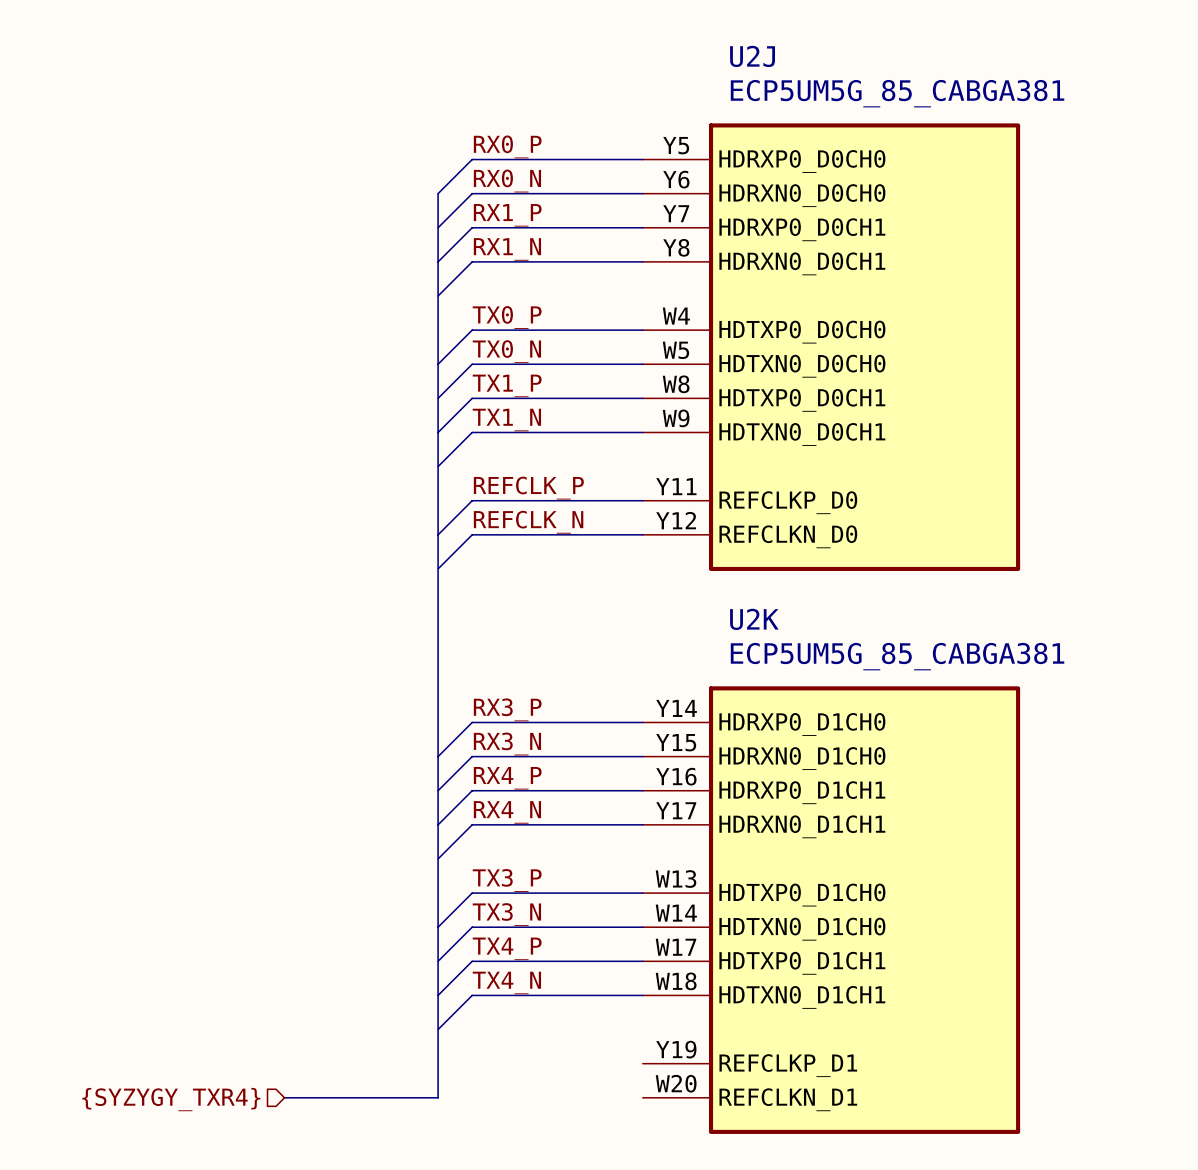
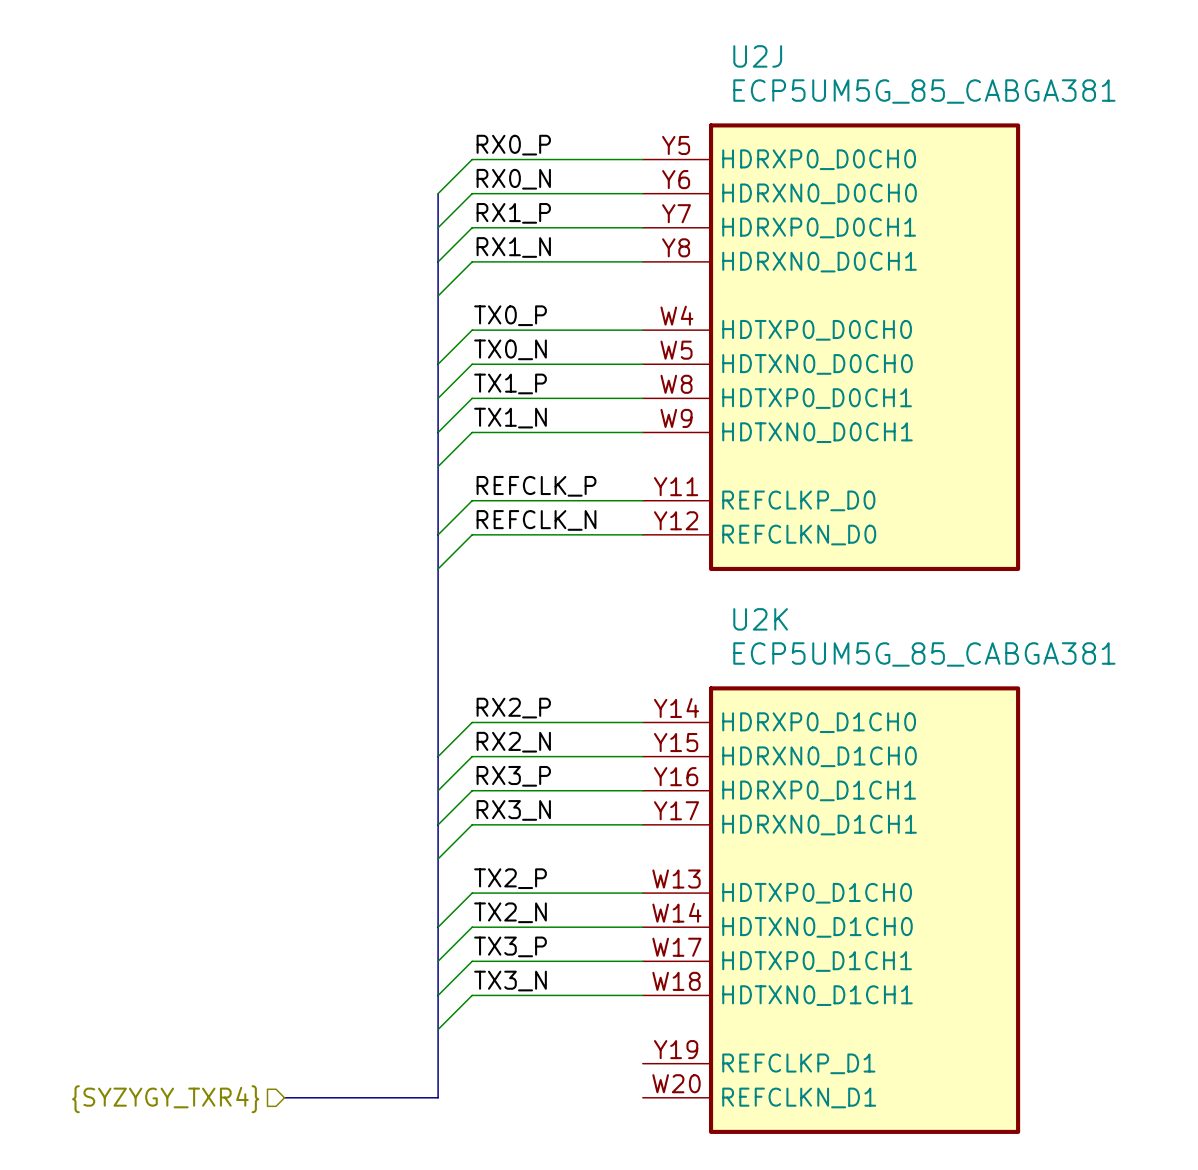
label: RX3_P (507, 709) -> RX2_P (513, 708)
label: RX3_N (507, 743) -> RX2_N (513, 742)
label: RX4_P (507, 778) -> RX3_P (513, 776)
label: RX4_N (507, 812) -> RX3_N (513, 810)
label: TX3_P (507, 880) -> TX2_P (510, 878)
label: TX3_N (506, 914) -> TX2_N (510, 912)
label: TX4_P (507, 948) -> TX3_P (510, 946)
label: TX4_N (506, 982) -> TX3_N (510, 981)

